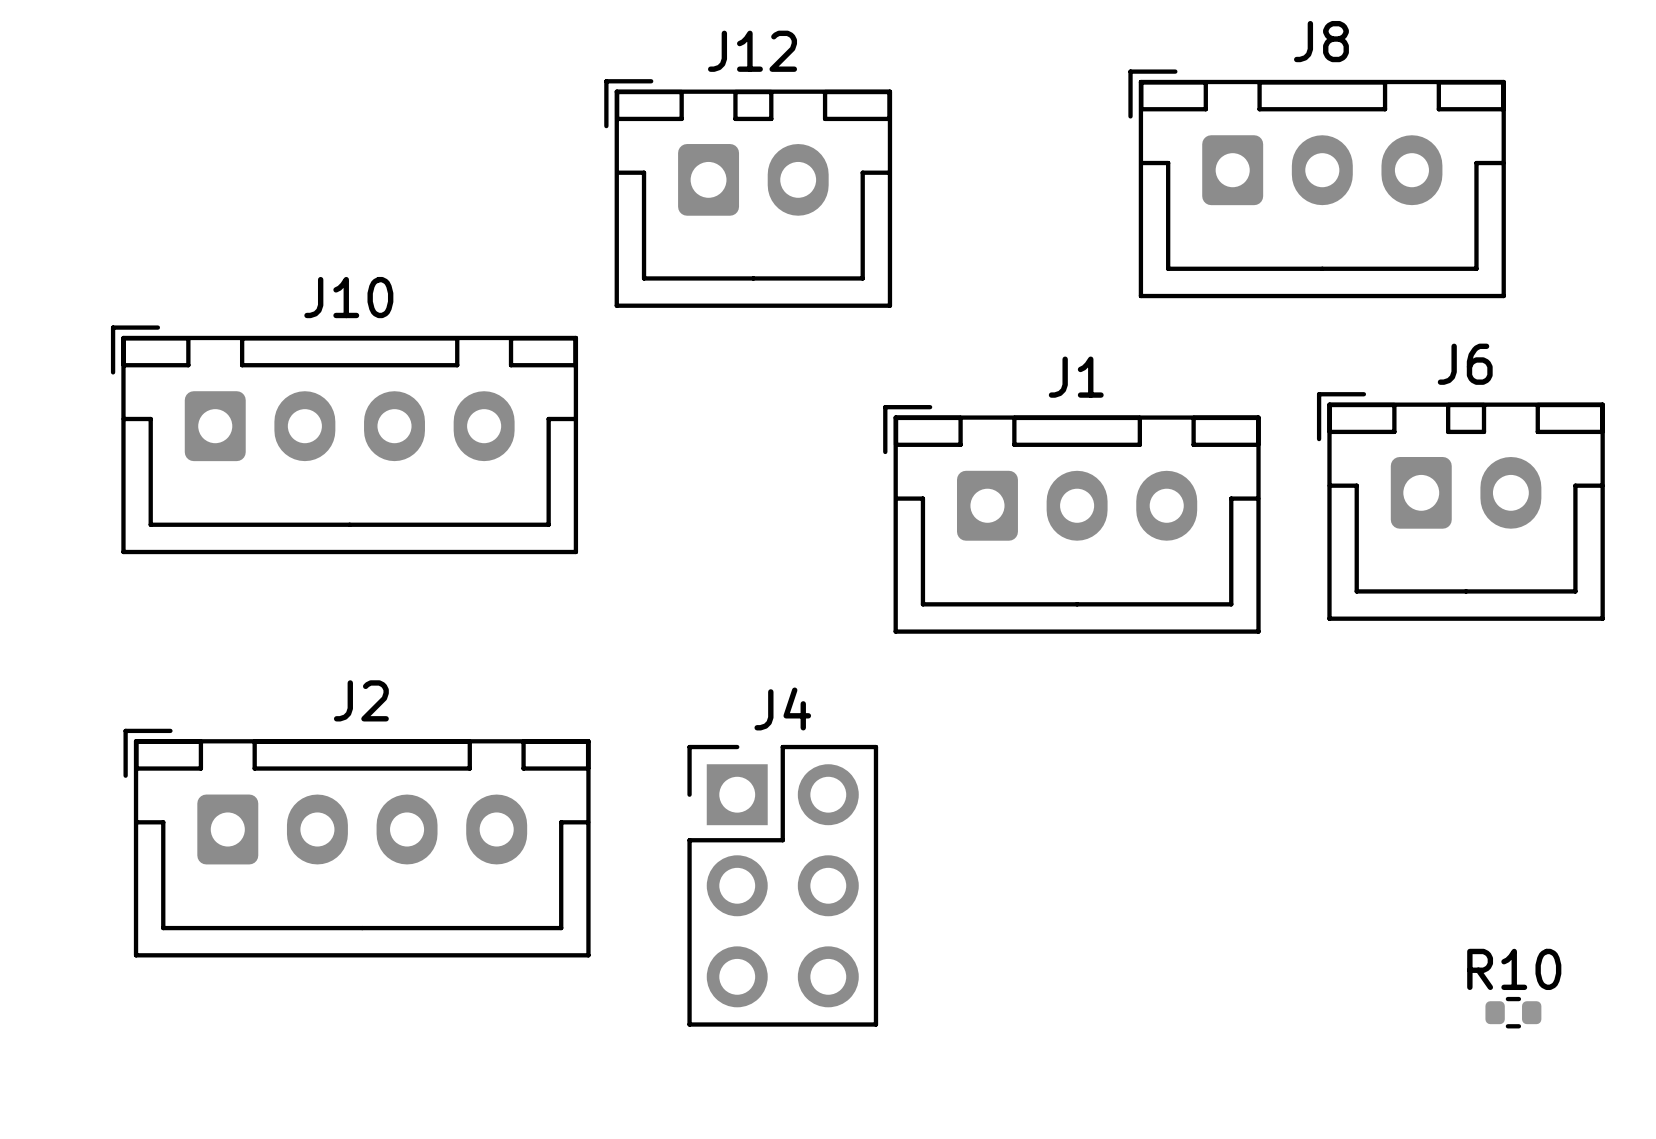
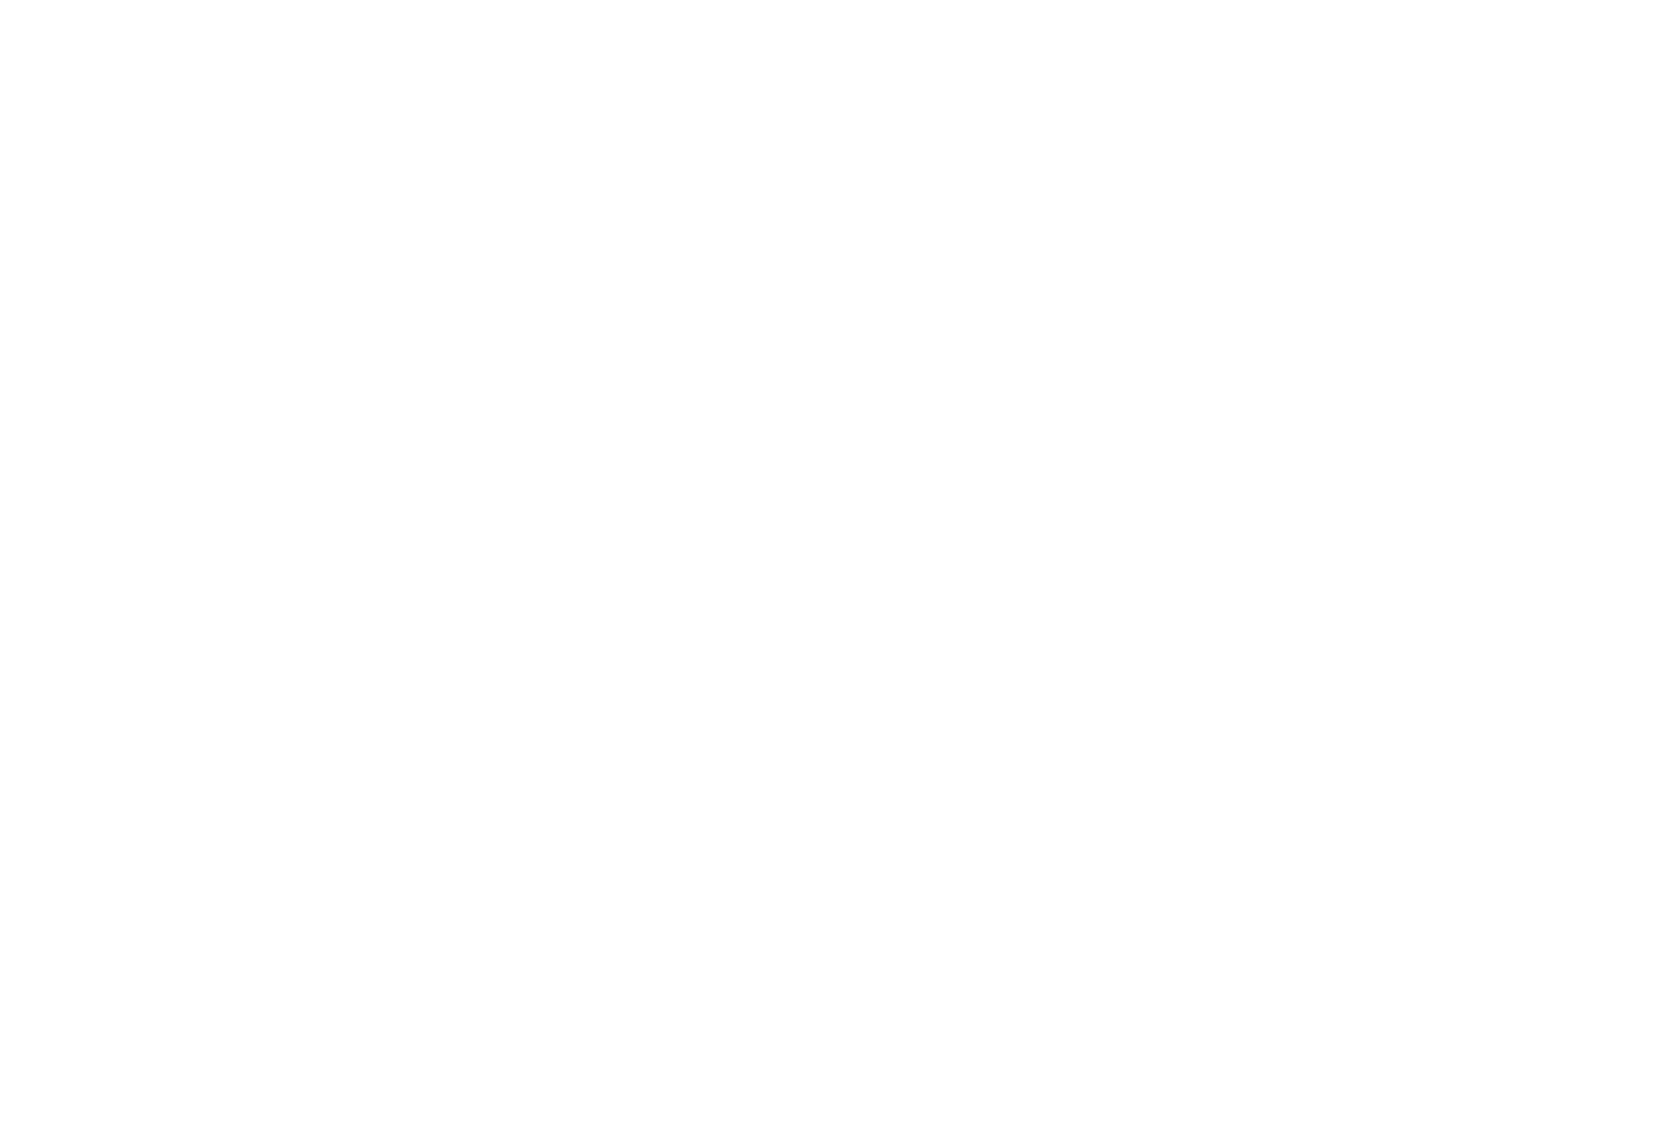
J8: (1317, 183) -> none
J12: (748, 193) -> none
J10: (344, 439) -> none
J6: (1460, 506) -> none
J1: (1071, 519) -> none
J2: (357, 843) -> none
J4: (782, 885) -> none
R10: (1513, 1012) -> none

